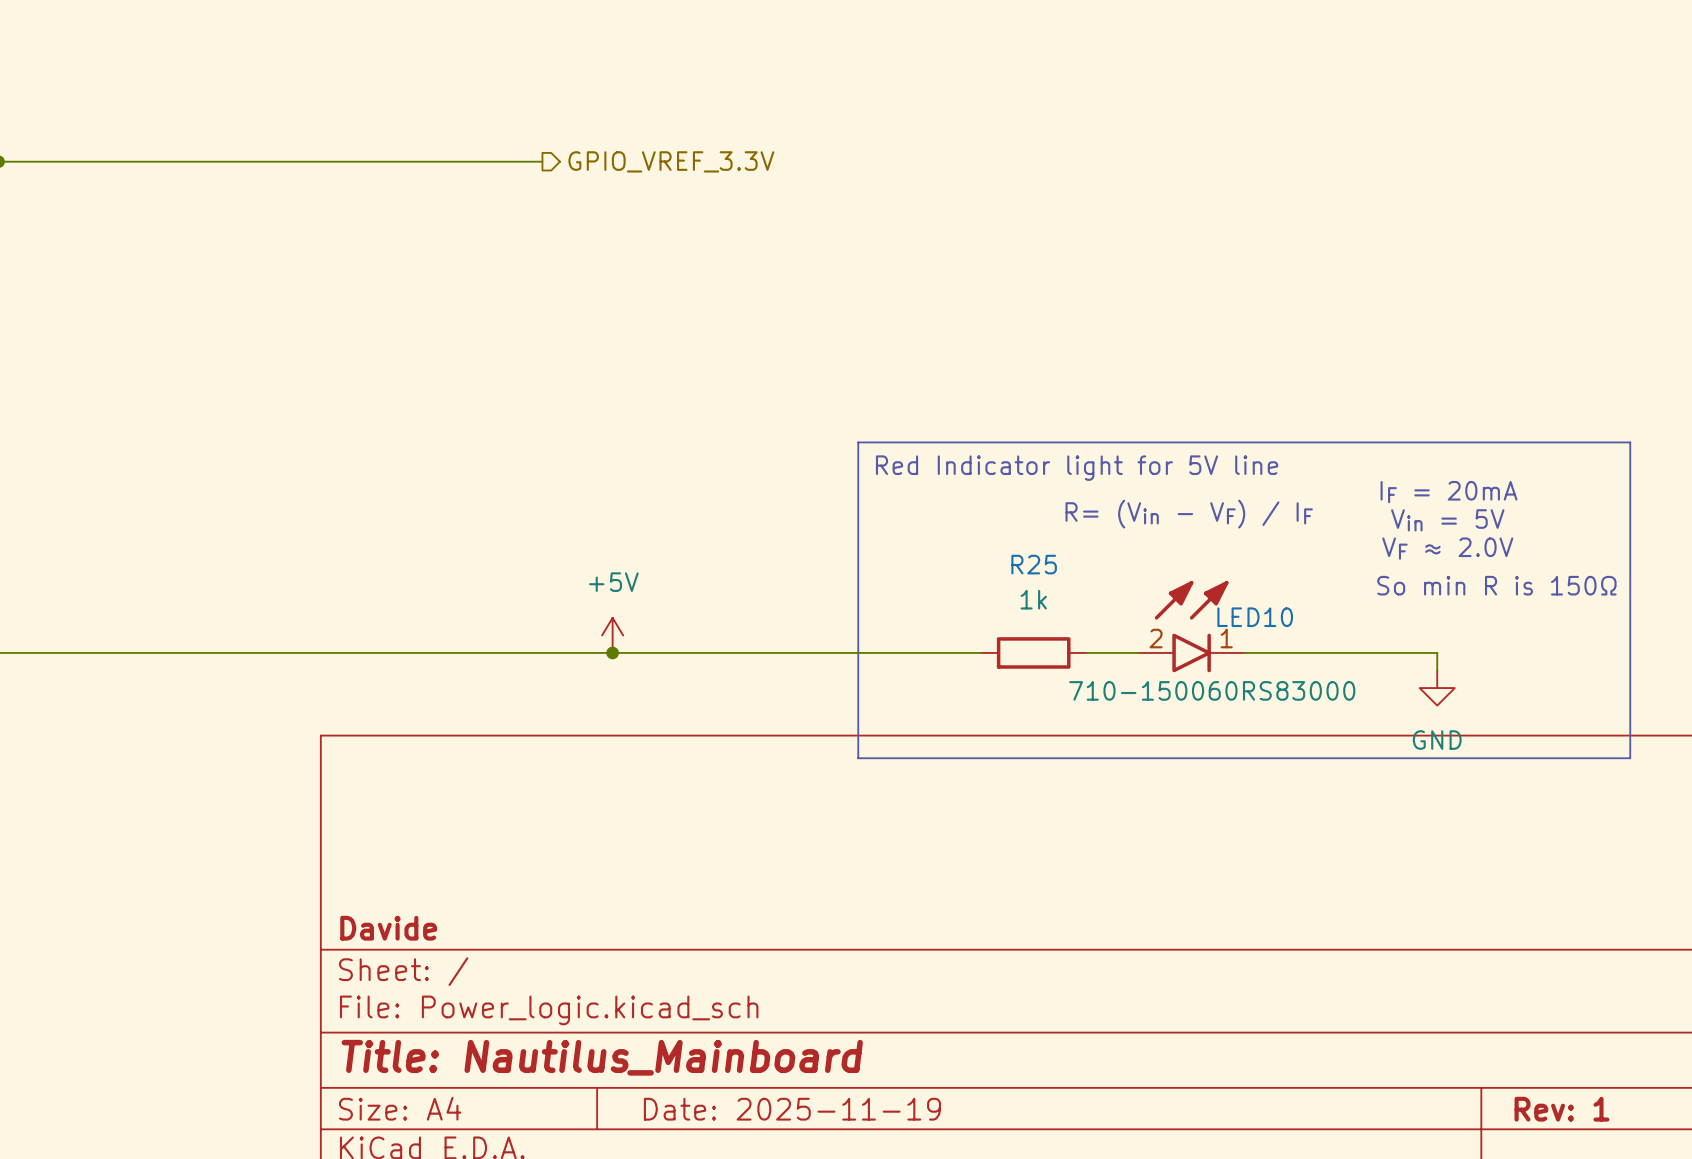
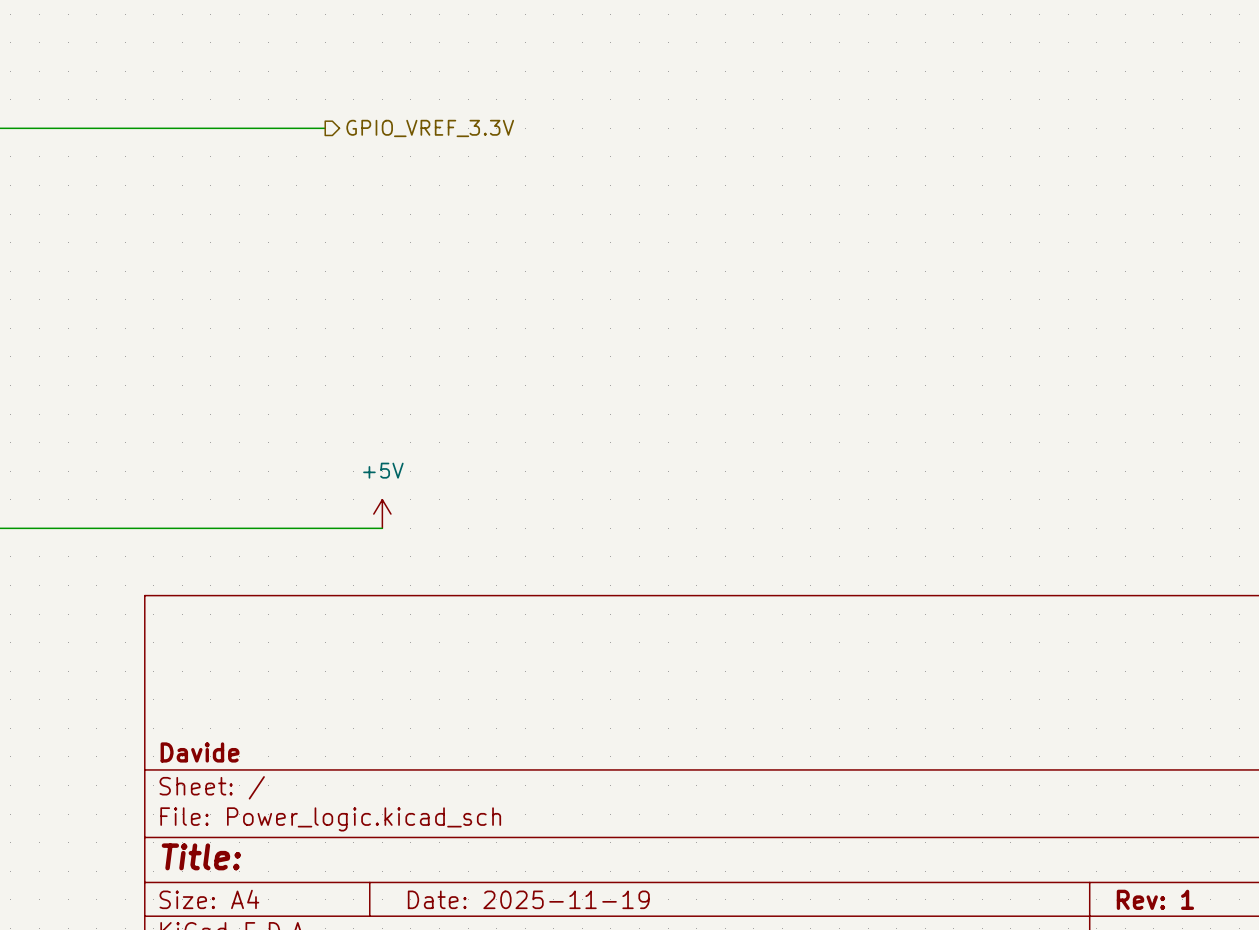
line: (858, 442) (1630, 442) (1630, 758) (858, 758) (858, 442) -> none
text: Red Indicator light for 5V line (1077, 468) -> none
text: IF = 20mA (1449, 492) -> none
text: R= (Vin - VF) / IF (1189, 514) -> none
text: Vin = 5V (1447, 520) -> none
text: VF ≈ 2.0V (1447, 548) -> none
text: So min R is 150Ω (1496, 585) -> none
LED10: 710-150060RS83000 (1191, 626) -> none
wire: (612, 652) (981, 652) -> none
junction: (612, 652) -> none
R25: 1k (1033, 652) -> none
wire: (1086, 652) (1138, 652) -> none
wire: (1244, 652) (1437, 652) (1437, 670) -> none
power symbol: GND (1437, 688) -> none
title block: Title: Nautilus_Mainboard (602, 1057) -> Title: (201, 856)

